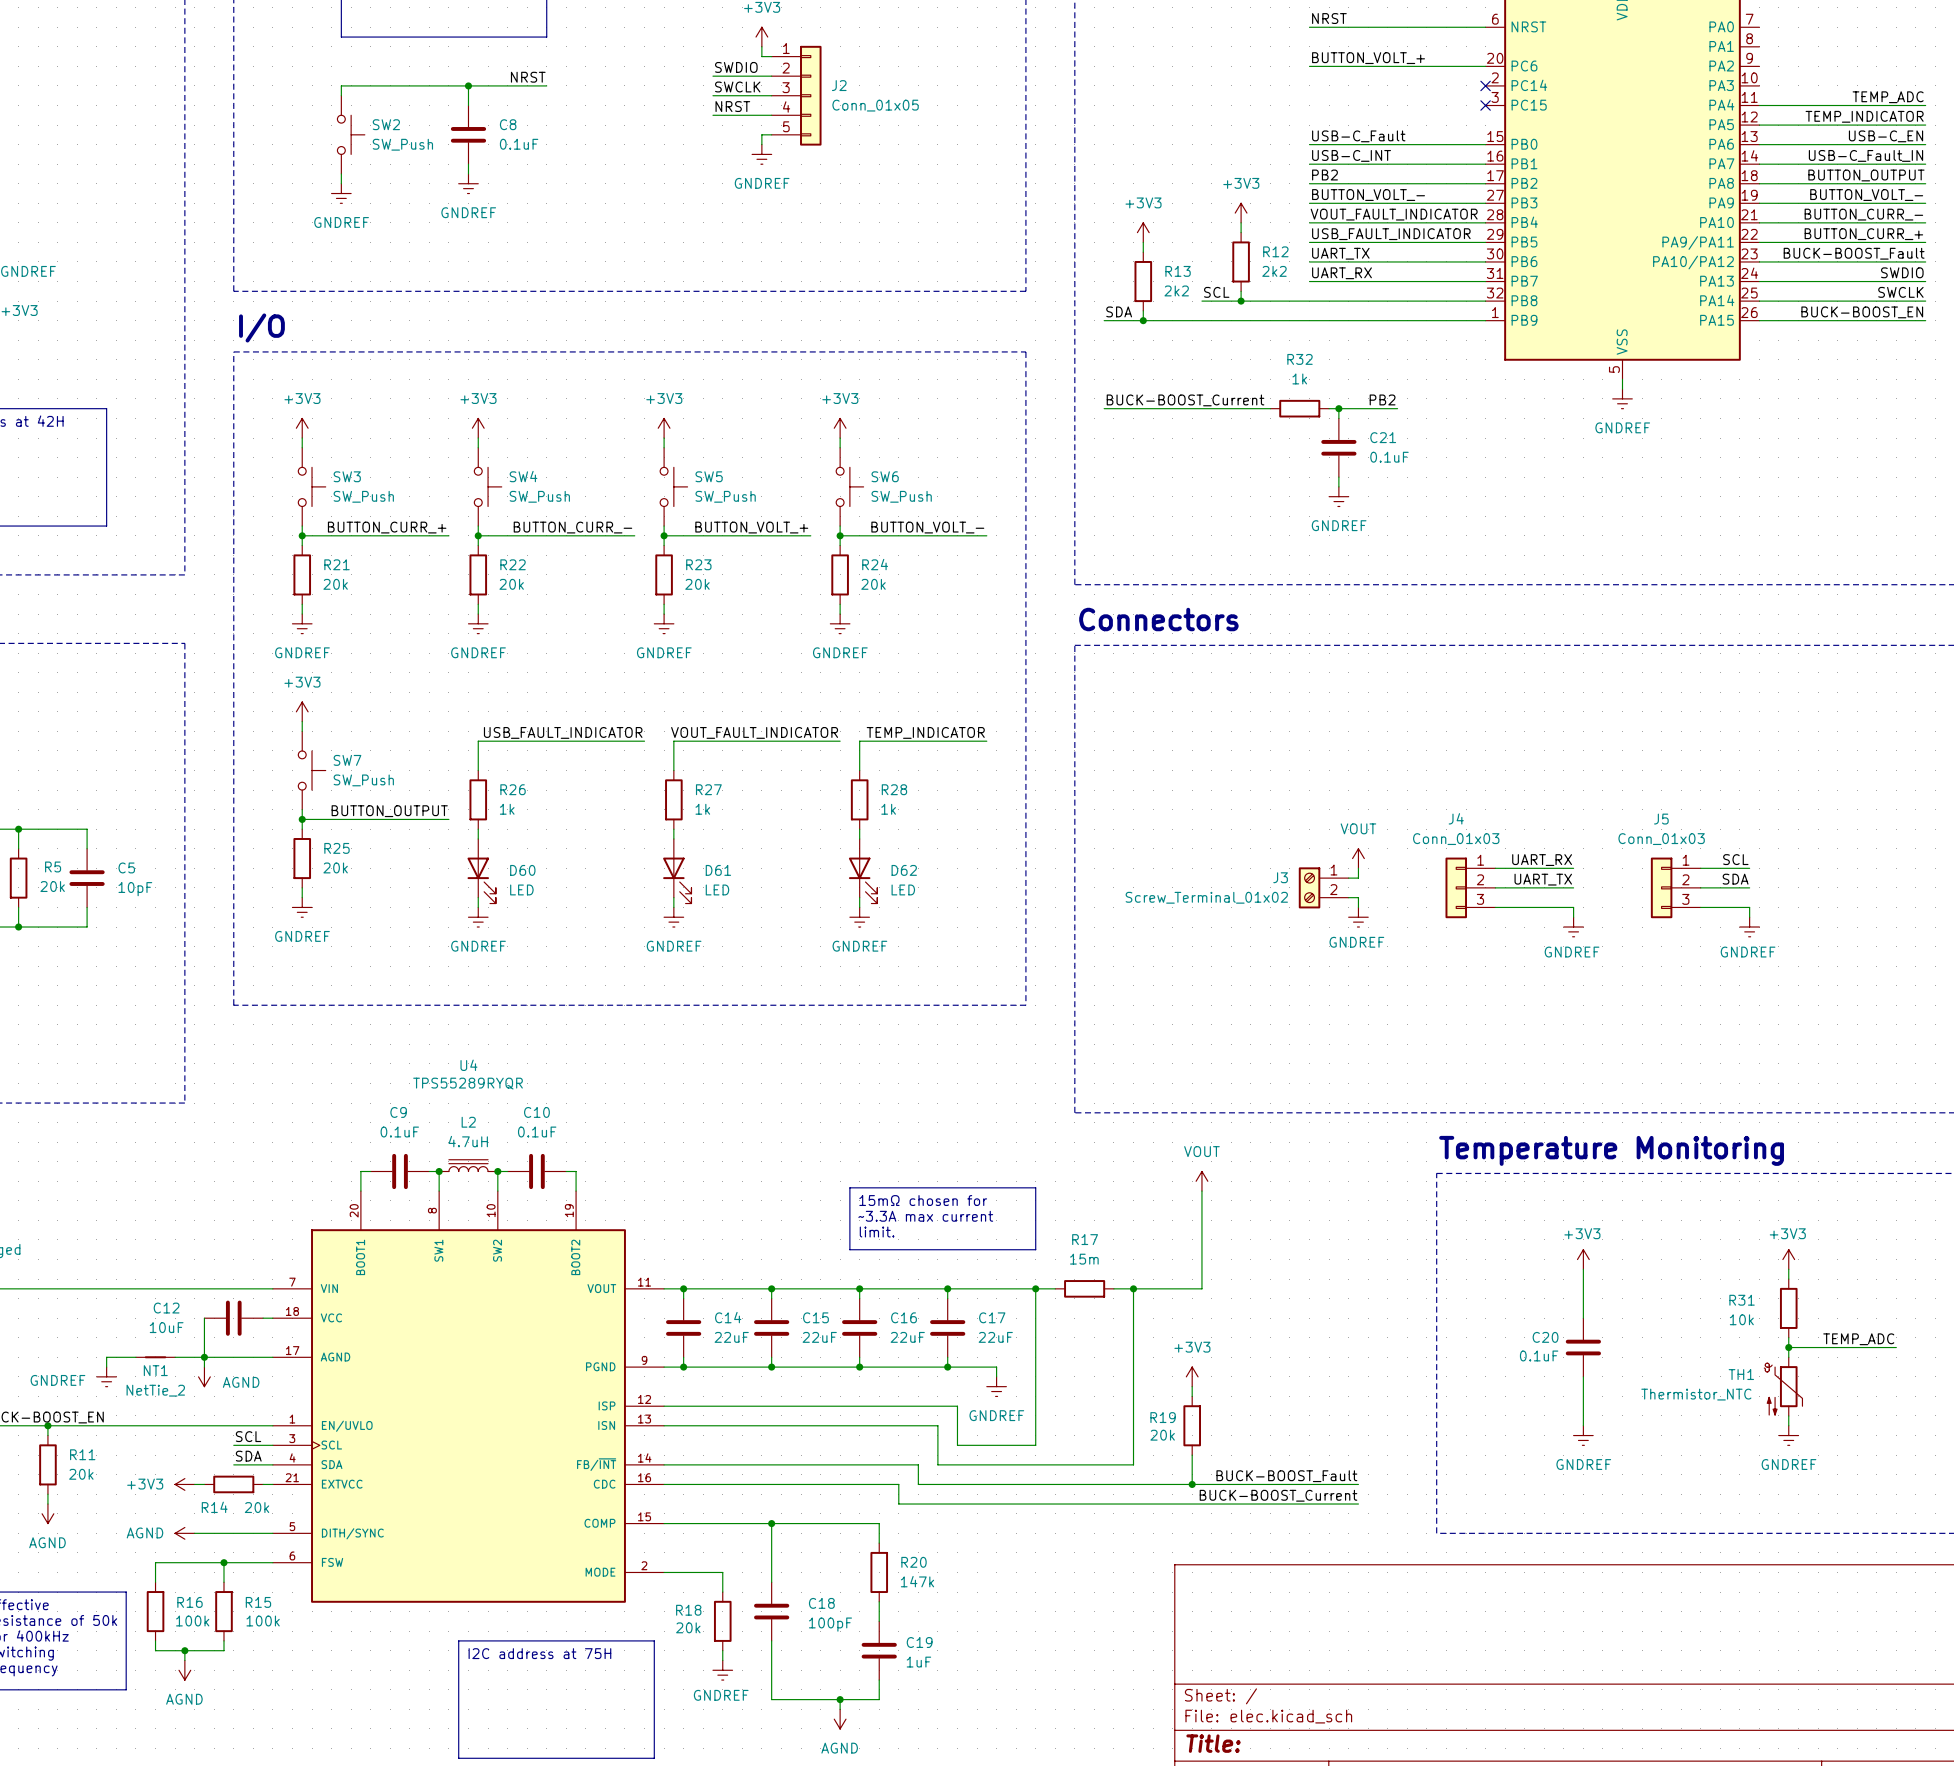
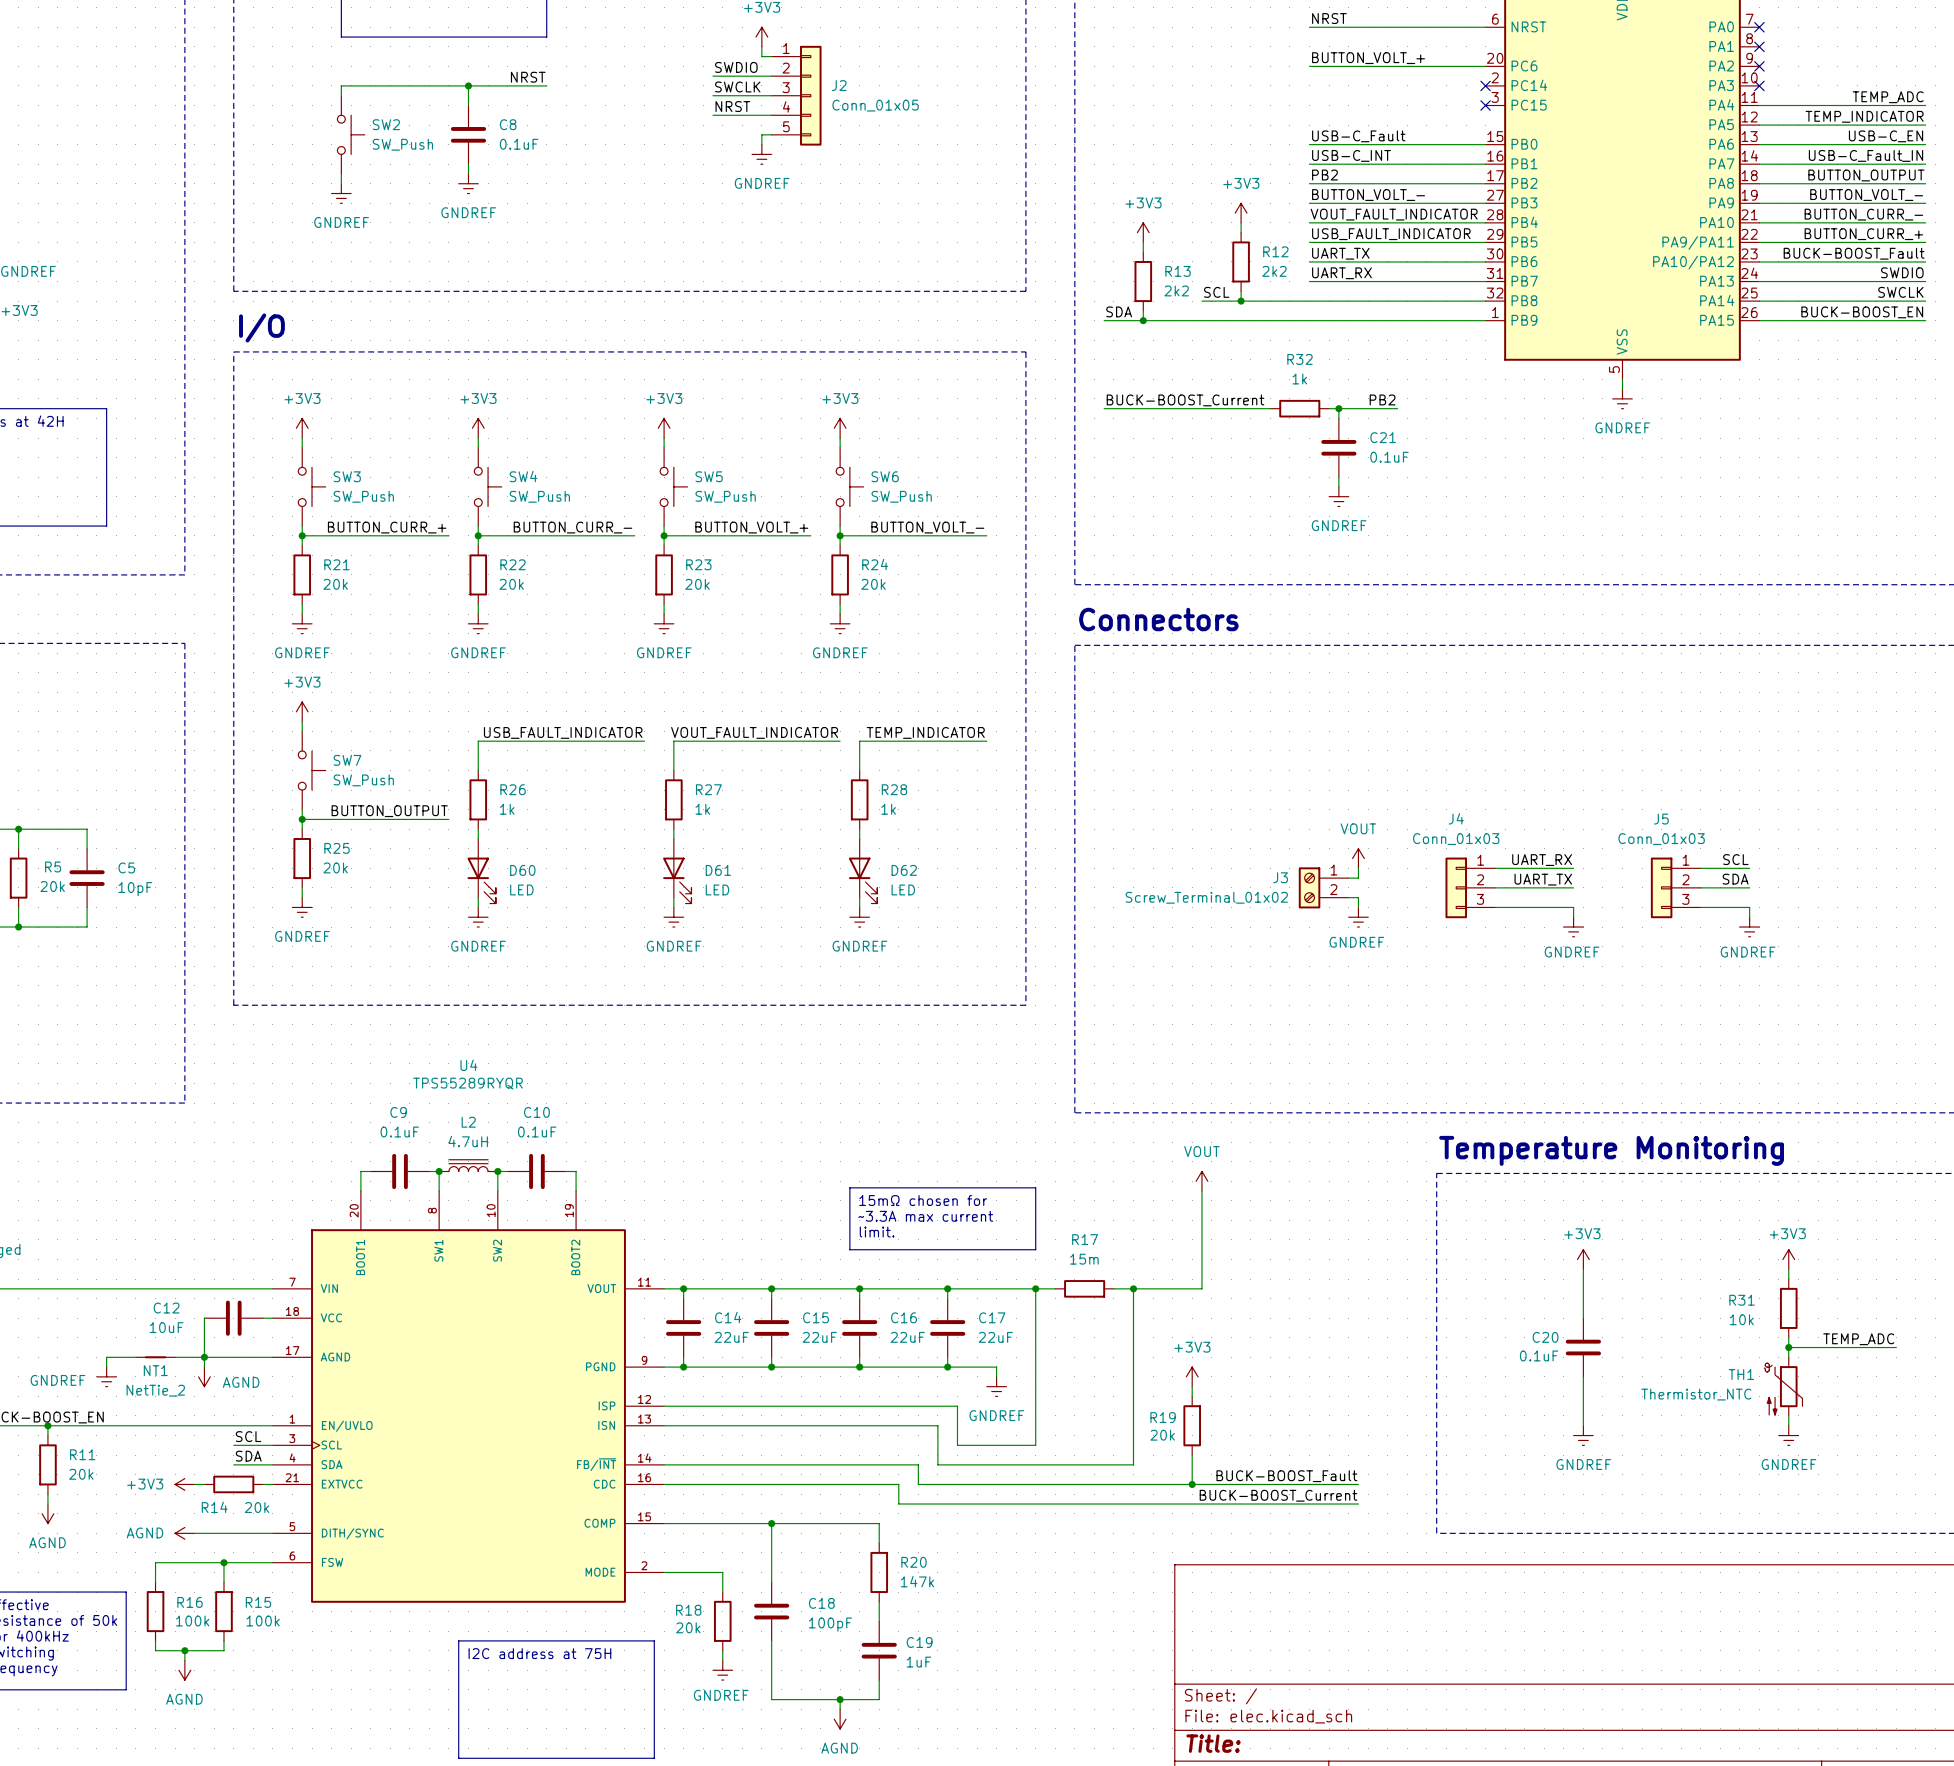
no-connect mark: none -> (1759, 27)
no-connect mark: none -> (1759, 46)
no-connect mark: none -> (1759, 66)
no-connect mark: none -> (1759, 85)

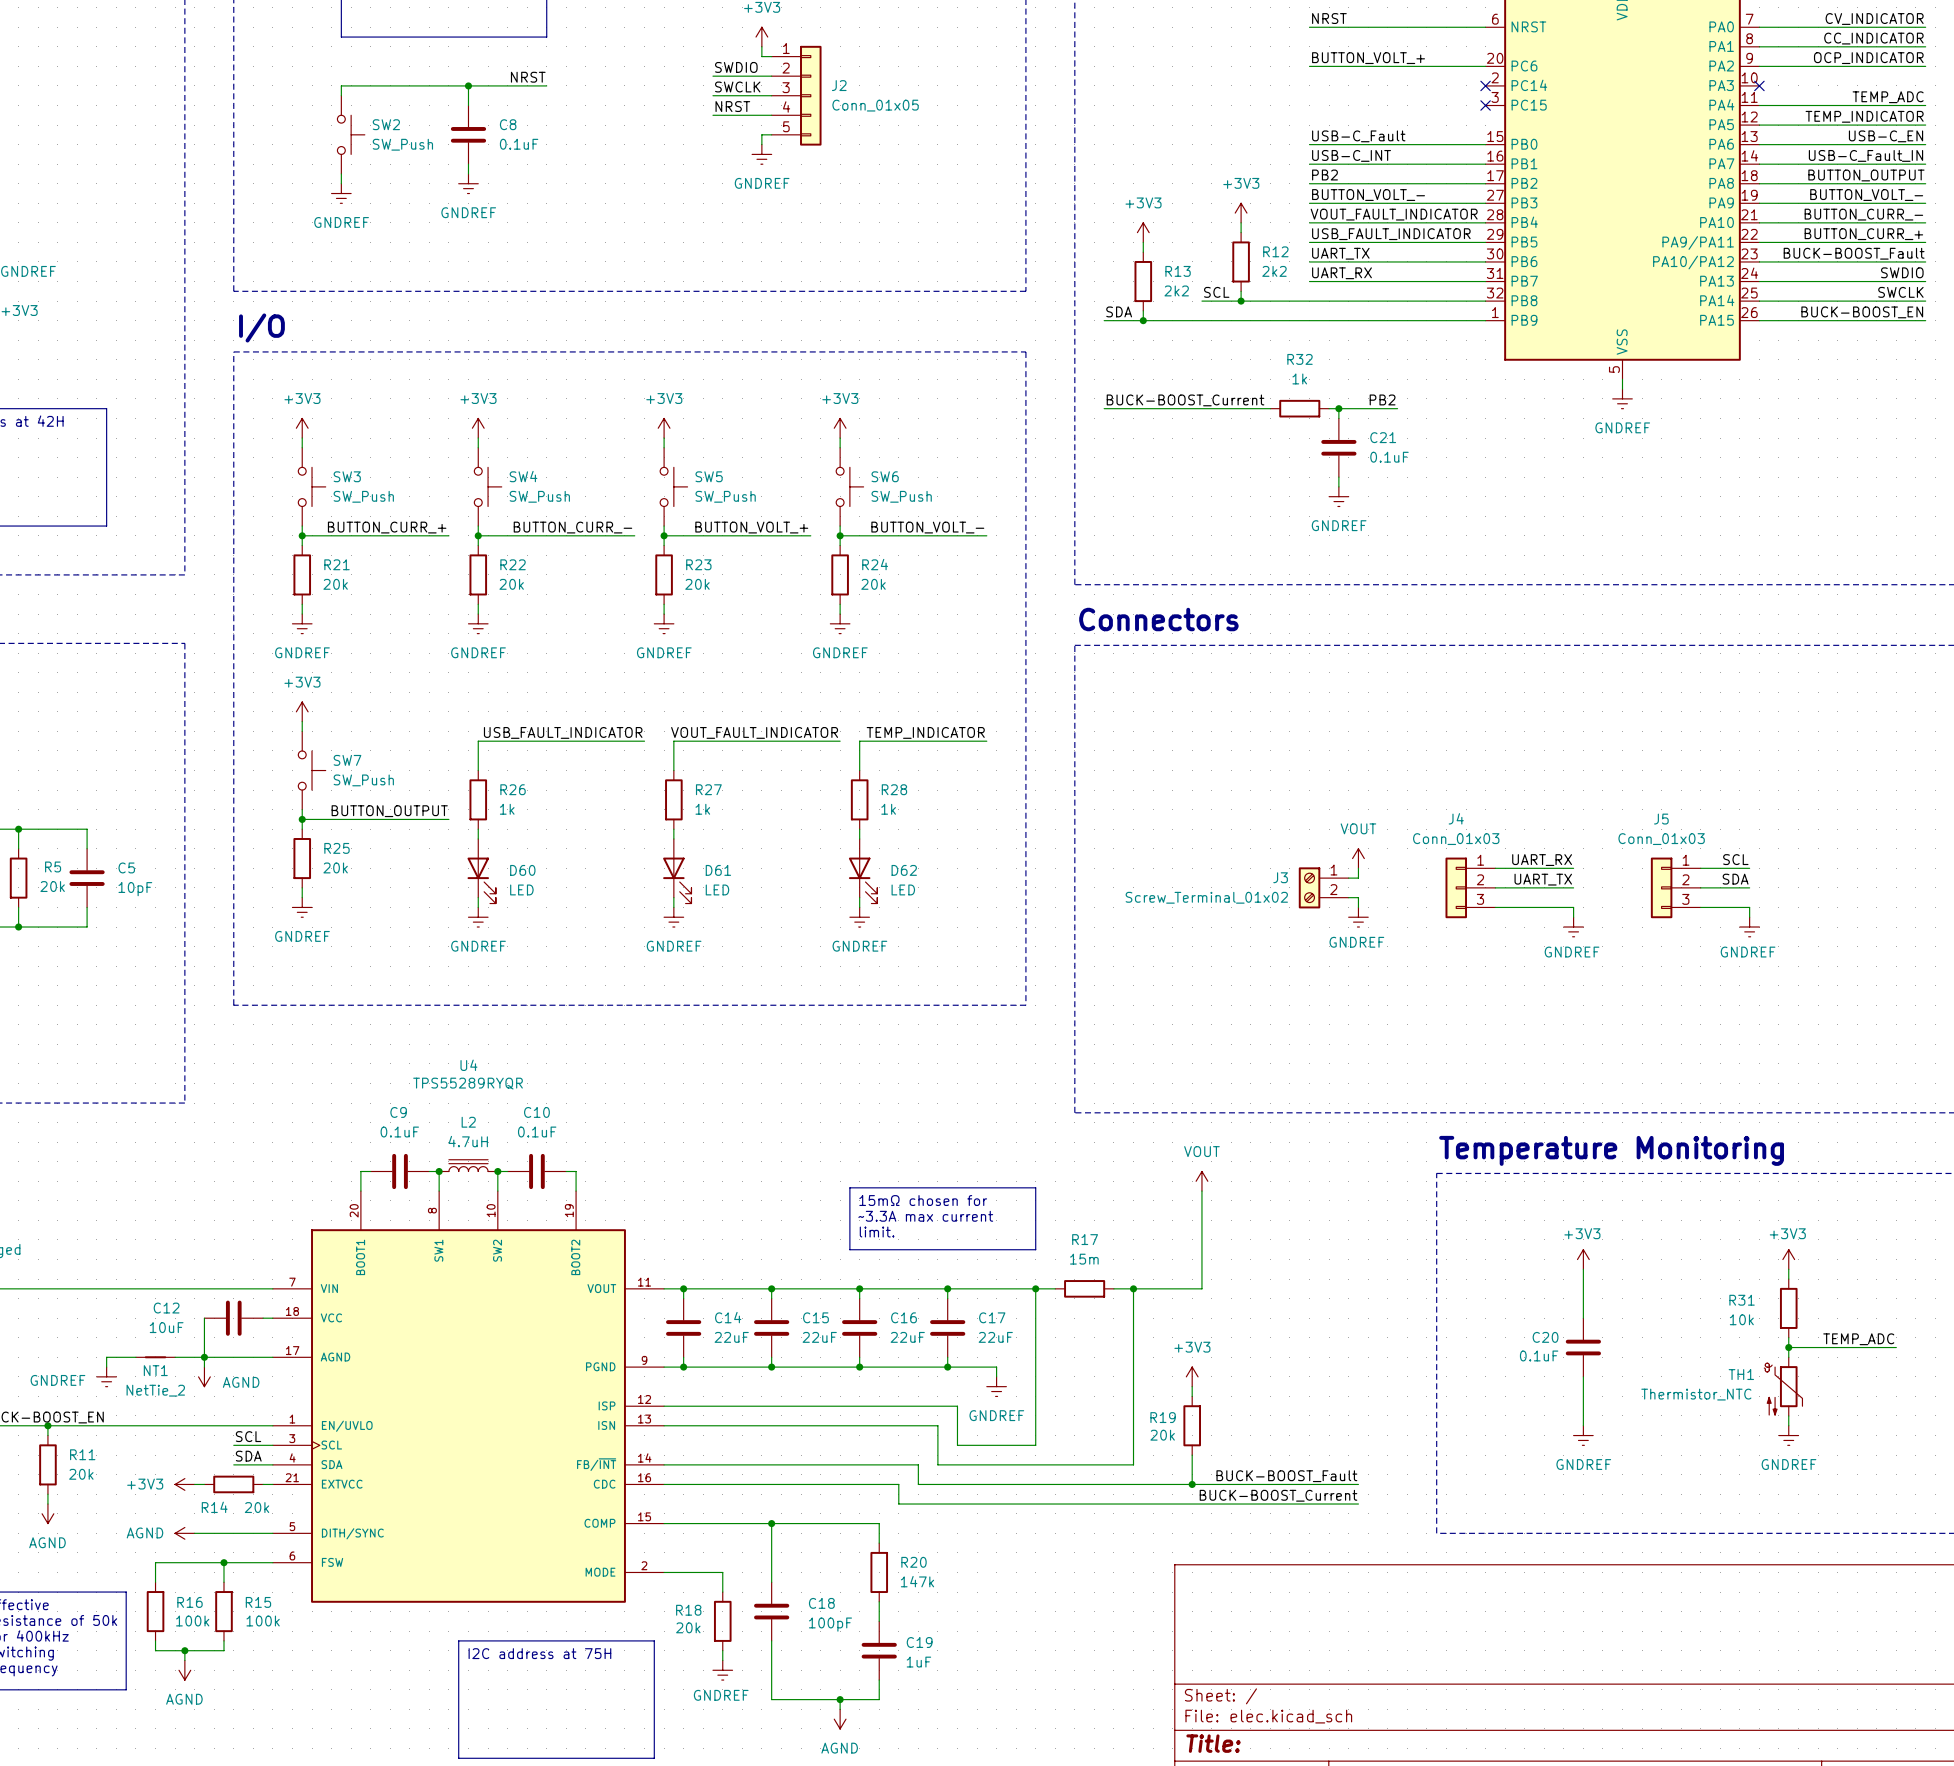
label: none -> CV_INDICATOR (1874, 19)
wire: none -> (1759, 27) (1925, 27)
no-connect mark: (1759, 27) -> none
label: none -> CC_INDICATOR (1873, 38)
wire: none -> (1759, 46) (1925, 46)
no-connect mark: (1759, 46) -> none
label: none -> OCP_INDICATOR (1868, 58)
wire: none -> (1759, 66) (1925, 66)
no-connect mark: (1759, 66) -> none

